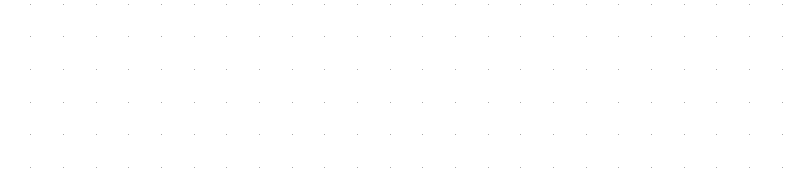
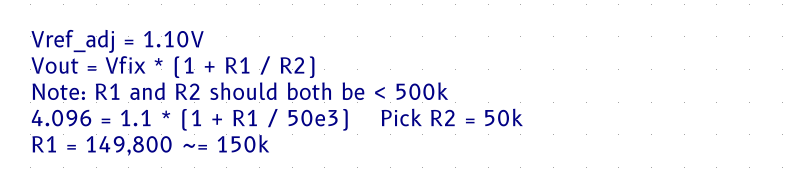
text: none -> Vref_adj = 1.10V (117, 41)
text: none -> Vout = Vfix * (1 + R1 / R2) (172, 67)
text: none -> Note: R1 and R2 should both be < 500k (240, 91)
text: none -> 4.096 = 1.1 * (1 + R1 / 50e3) Pick R2 = 50k (277, 119)
text: none -> R1 = 149,800 ~= 150k (150, 145)

